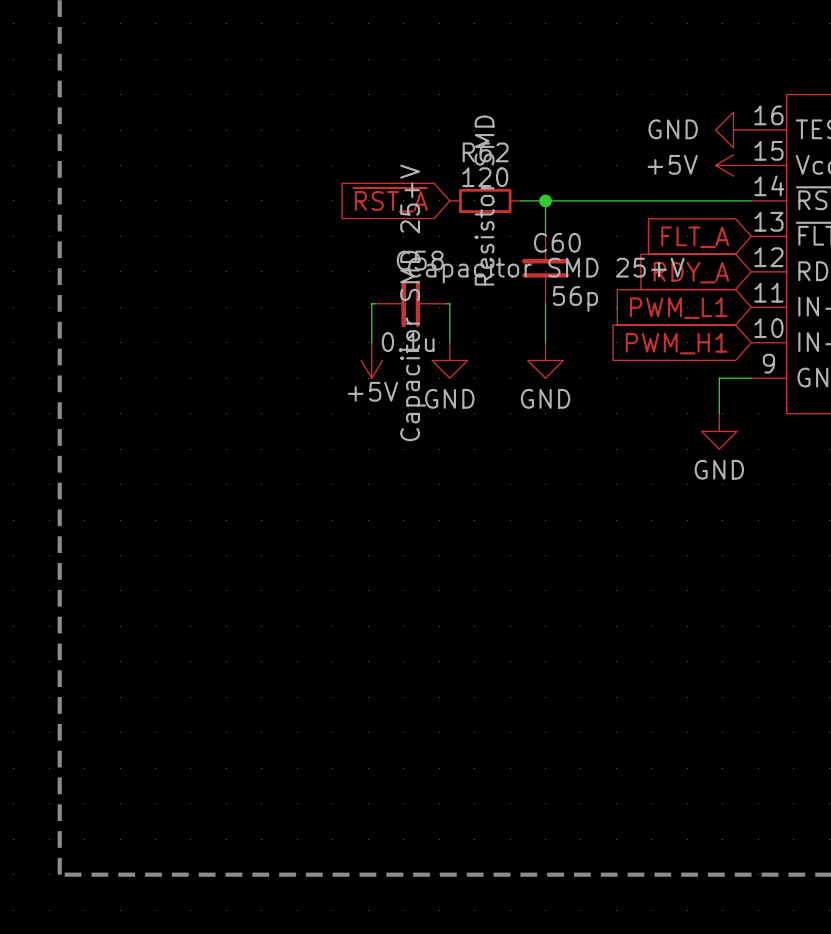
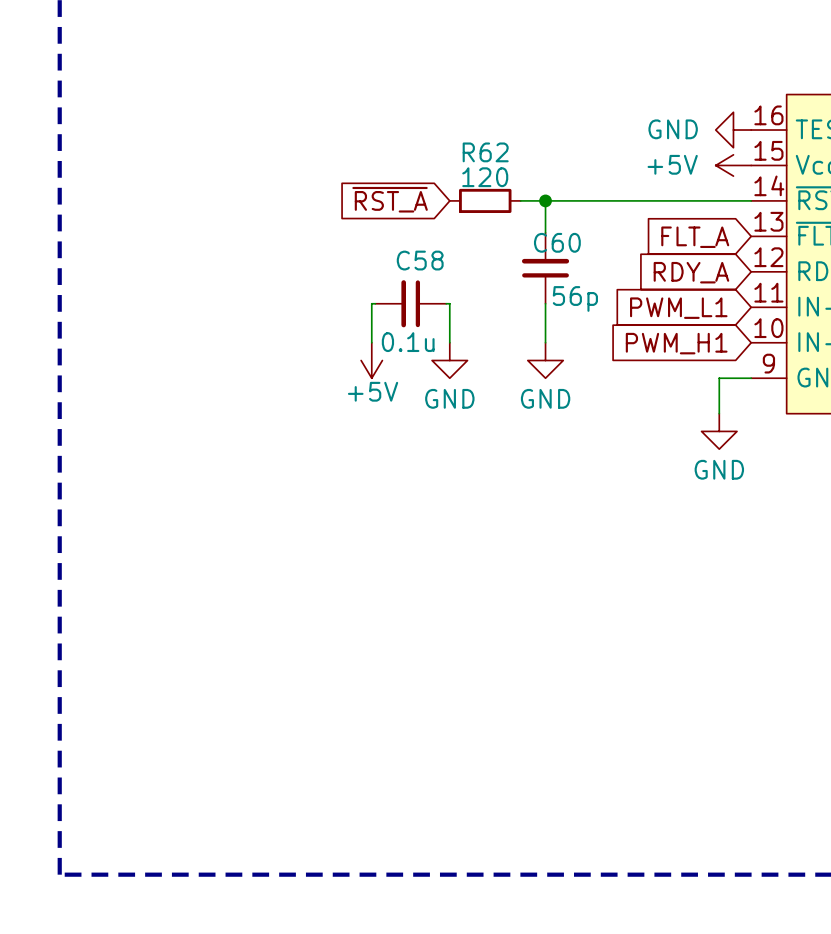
R62 text: Resistor SMD (484, 200) -> none
C60 text: Capacitor SMD 25+V (546, 270) -> none
C58 text: Capacitor SMD 25+V (413, 302) -> none

